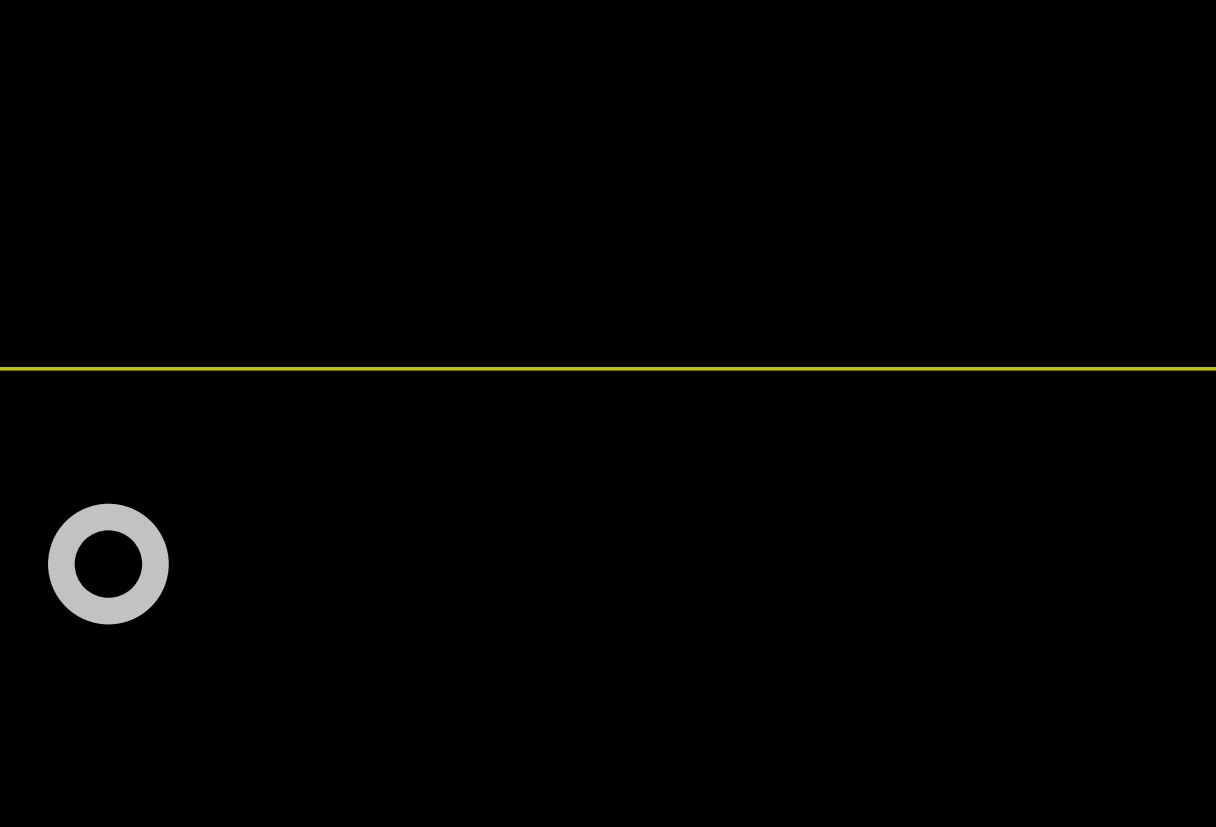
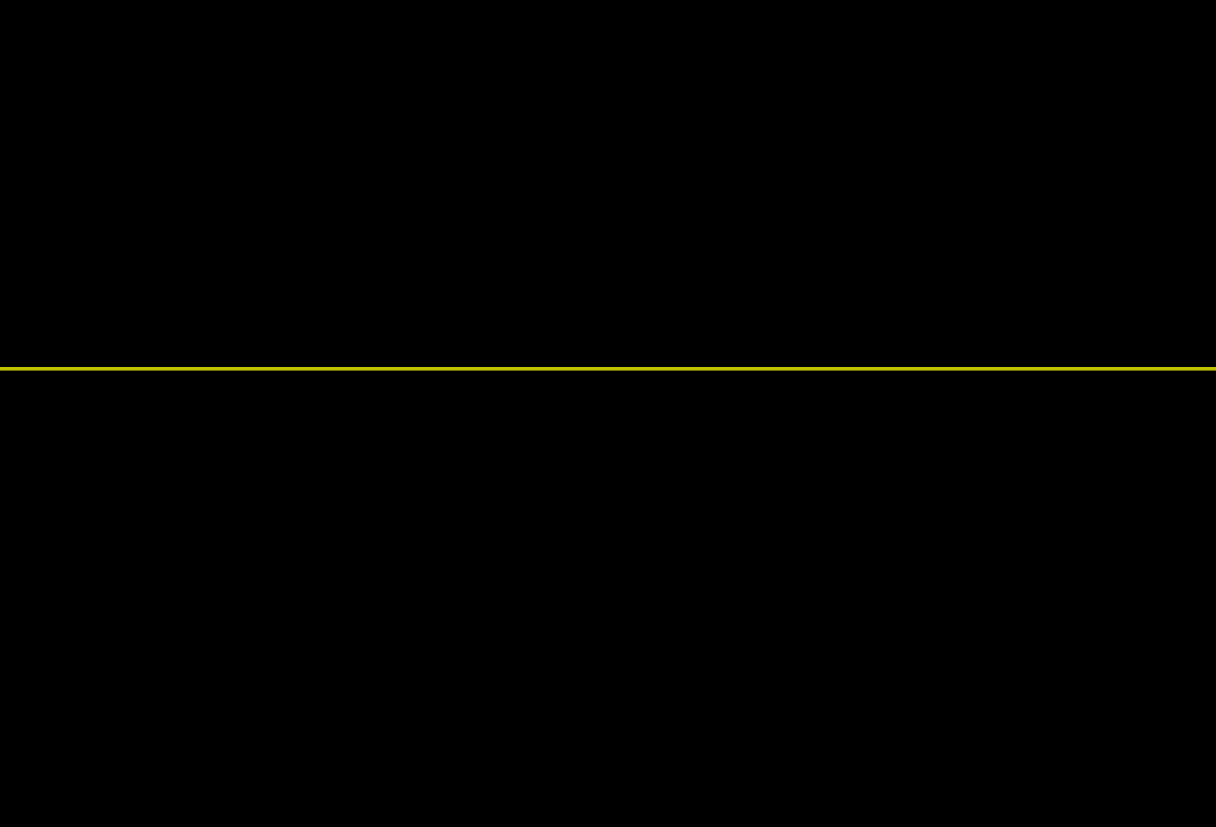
via: (108, 564) -> none

